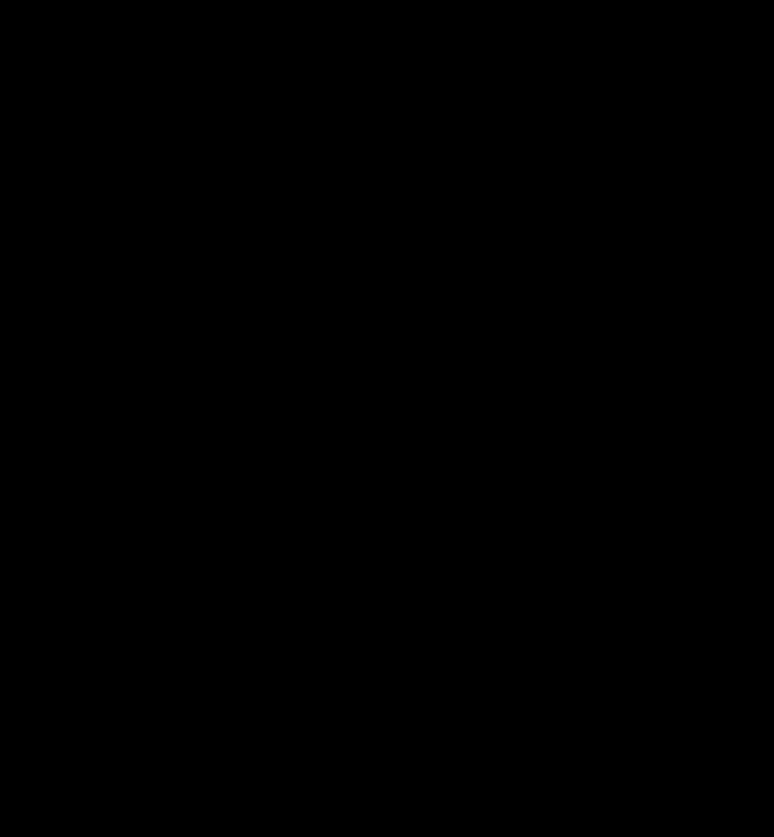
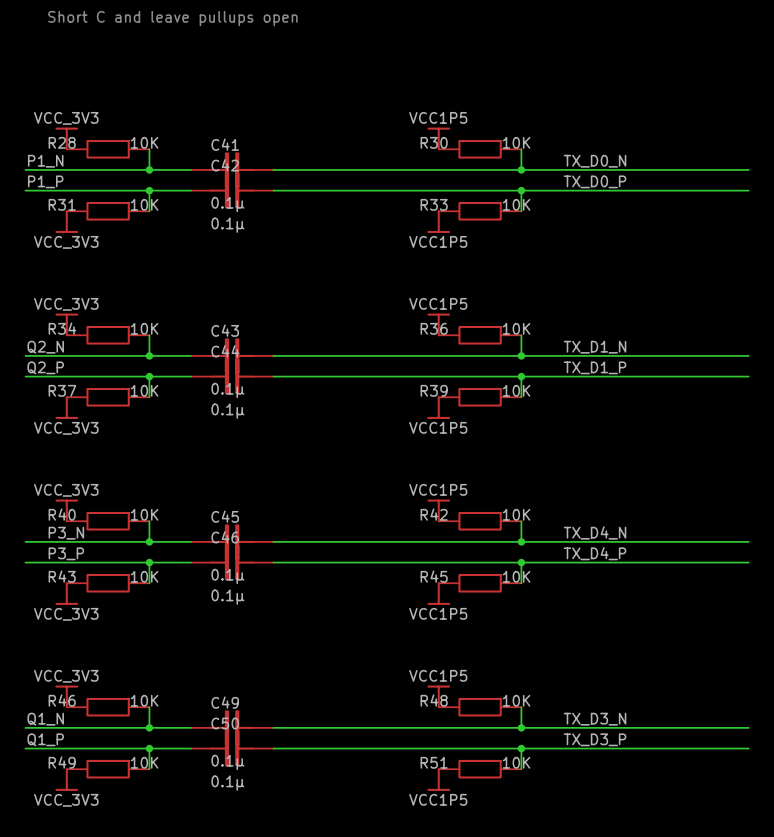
text: none -> Short C and leave pullups open (172, 18)
power symbol: none -> VCC_3V3 (66, 138)
power symbol: none -> VCC1P5 (438, 138)
R28: none -> 10K (108, 149)
wire: none -> (149, 149) (149, 169)
R30: none -> 10K (480, 149)
wire: none -> (521, 149) (521, 169)
label: none -> P1_N (45, 161)
label: none -> TX_D0_N (595, 161)
wire: none -> (25, 169) (190, 169)
junction: none -> (149, 169)
C41: none -> 0.1μ (232, 169)
wire: none -> (273, 169) (748, 169)
junction: none -> (521, 169)
label: none -> P1_P (45, 181)
label: none -> TX_D0_P (595, 181)
wire: none -> (25, 190) (190, 190)
wire: none -> (149, 190) (149, 211)
junction: none -> (149, 190)
C42: none -> 0.1μ (232, 190)
wire: none -> (273, 190) (748, 190)
wire: none -> (521, 190) (521, 211)
junction: none -> (521, 190)
R31: none -> 10K (108, 211)
R33: none -> 10K (480, 211)
power symbol: none -> VCC_3V3 (66, 221)
power symbol: none -> VCC1P5 (438, 221)
power symbol: none -> VCC_3V3 (66, 324)
power symbol: none -> VCC1P5 (438, 324)
R34: none -> 10K (108, 335)
wire: none -> (149, 335) (149, 355)
R36: none -> 10K (480, 335)
wire: none -> (521, 335) (521, 355)
label: none -> Q2_N (45, 347)
label: none -> TX_D1_N (595, 347)
wire: none -> (25, 355) (190, 355)
junction: none -> (149, 355)
C43: none -> 0.1μ (232, 355)
wire: none -> (273, 355) (748, 355)
junction: none -> (521, 355)
label: none -> Q2_P (45, 367)
label: none -> TX_D1_P (595, 367)
wire: none -> (25, 376) (190, 376)
wire: none -> (149, 376) (149, 397)
junction: none -> (149, 376)
C44: none -> 0.1μ (232, 376)
wire: none -> (273, 376) (748, 376)
wire: none -> (521, 376) (521, 397)
junction: none -> (521, 376)
R37: none -> 10K (108, 397)
R39: none -> 10K (480, 397)
power symbol: none -> VCC_3V3 (66, 407)
power symbol: none -> VCC1P5 (438, 407)
power symbol: none -> VCC_3V3 (66, 510)
power symbol: none -> VCC1P5 (438, 510)
R40: none -> 10K (108, 521)
wire: none -> (149, 521) (149, 541)
R42: none -> 10K (480, 521)
wire: none -> (521, 521) (521, 541)
label: none -> TX_D4_N (595, 532)
label: none -> P3_N (66, 533)
wire: none -> (25, 541) (190, 541)
junction: none -> (149, 541)
C45: none -> 0.1μ (232, 541)
wire: none -> (273, 541) (748, 541)
junction: none -> (521, 541)
label: none -> P3_P (66, 553)
label: none -> TX_D4_P (595, 553)
wire: none -> (25, 562) (190, 562)
wire: none -> (149, 562) (149, 583)
junction: none -> (149, 562)
C46: none -> 0.1μ (232, 562)
wire: none -> (273, 562) (748, 562)
wire: none -> (521, 562) (521, 583)
junction: none -> (521, 562)
R43: none -> 10K (108, 583)
R45: none -> 10K (480, 583)
power symbol: none -> VCC_3V3 (66, 593)
power symbol: none -> VCC1P5 (438, 593)
power symbol: none -> VCC_3V3 (66, 696)
power symbol: none -> VCC1P5 (438, 696)
R46: none -> 10K (108, 707)
wire: none -> (149, 707) (149, 727)
R48: none -> 10K (480, 707)
wire: none -> (521, 707) (521, 727)
label: none -> Q1_N (45, 719)
label: none -> TX_D3_N (595, 719)
wire: none -> (25, 727) (190, 727)
junction: none -> (149, 727)
C49: none -> 0.1μ (232, 727)
wire: none -> (273, 727) (748, 727)
junction: none -> (521, 727)
label: none -> Q1_P (45, 739)
label: none -> TX_D3_P (595, 739)
wire: none -> (25, 748) (190, 748)
wire: none -> (149, 748) (149, 769)
junction: none -> (149, 748)
C50: none -> 0.1μ (232, 748)
wire: none -> (273, 748) (748, 748)
wire: none -> (521, 748) (521, 769)
junction: none -> (521, 748)
R49: none -> 10K (108, 769)
R51: none -> 10K (480, 769)
power symbol: none -> VCC_3V3 (66, 779)
power symbol: none -> VCC1P5 (438, 779)

